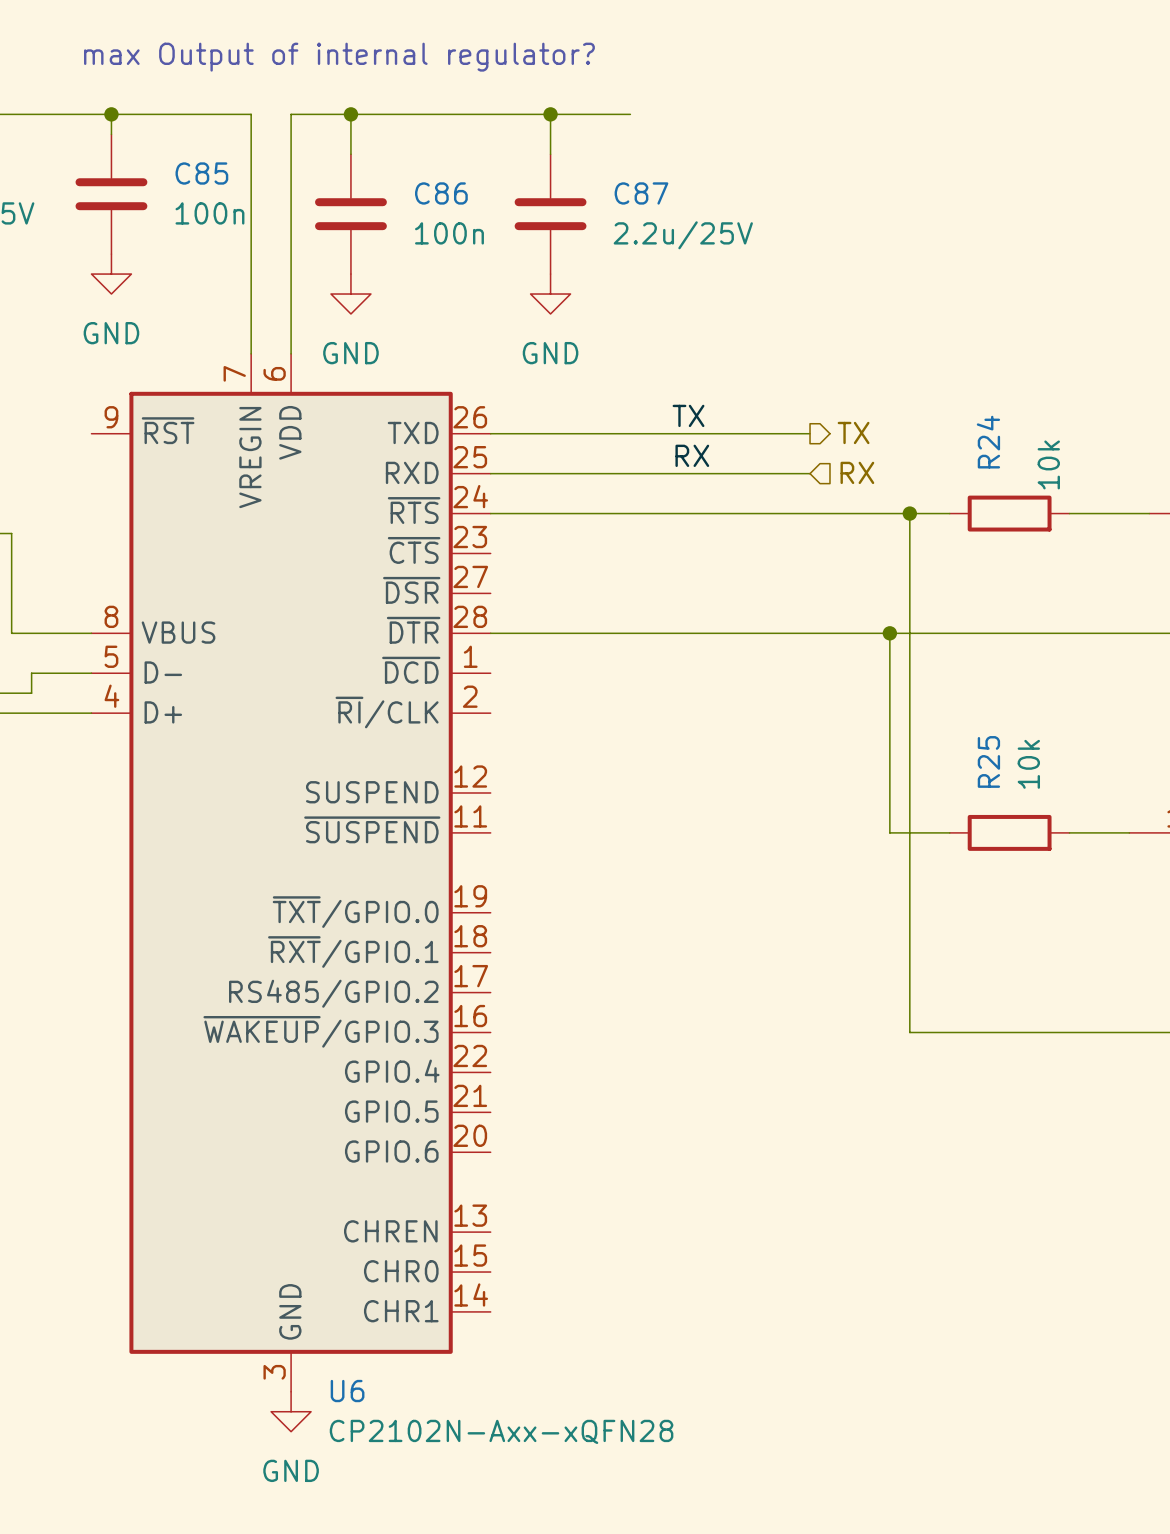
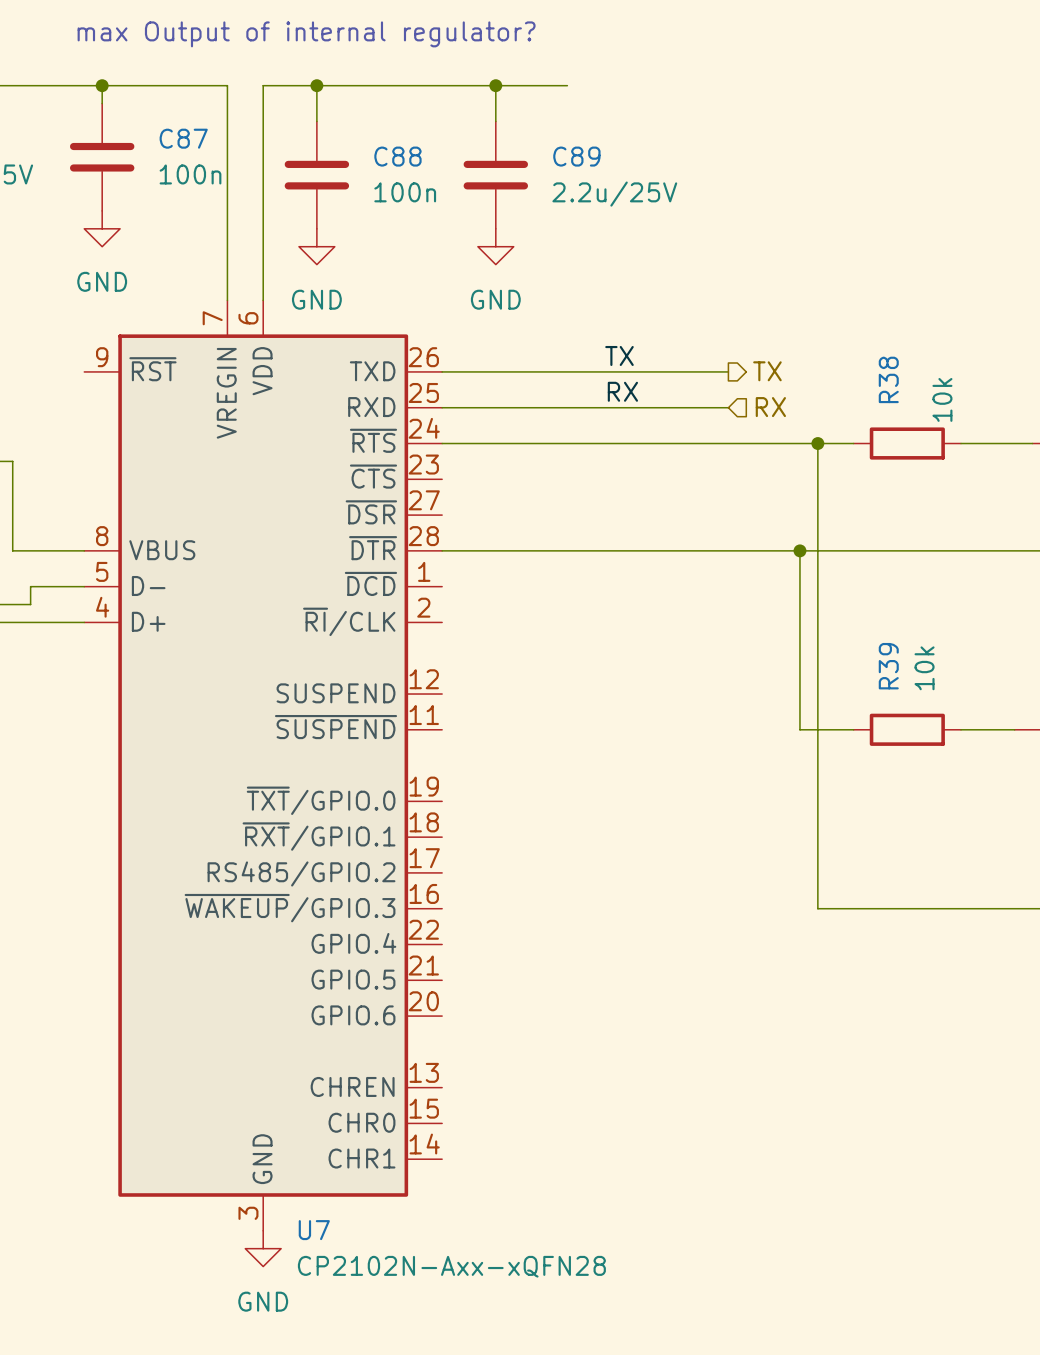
C85 name: C85 (201, 173) -> C87 (183, 138)
C86 name: C86 (441, 193) -> C88 (397, 156)
C87 name: C87 (641, 193) -> C89 (576, 156)
R24 name: R24 (988, 442) -> R38 (888, 379)
R25 name: R25 (988, 761) -> R39 (888, 666)
U6 name: U6 (347, 1391) -> U7 (314, 1230)

